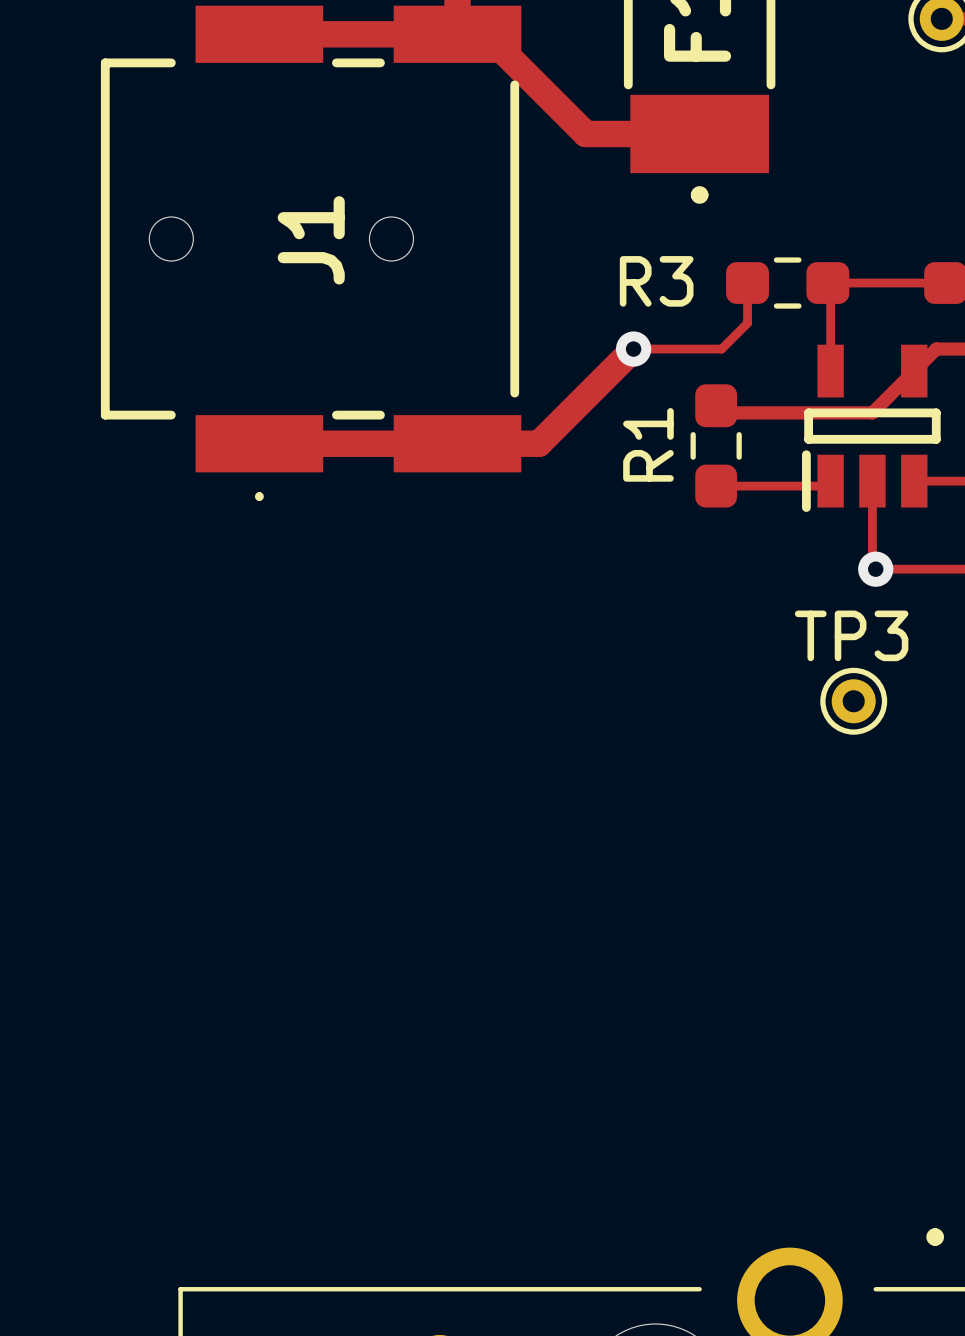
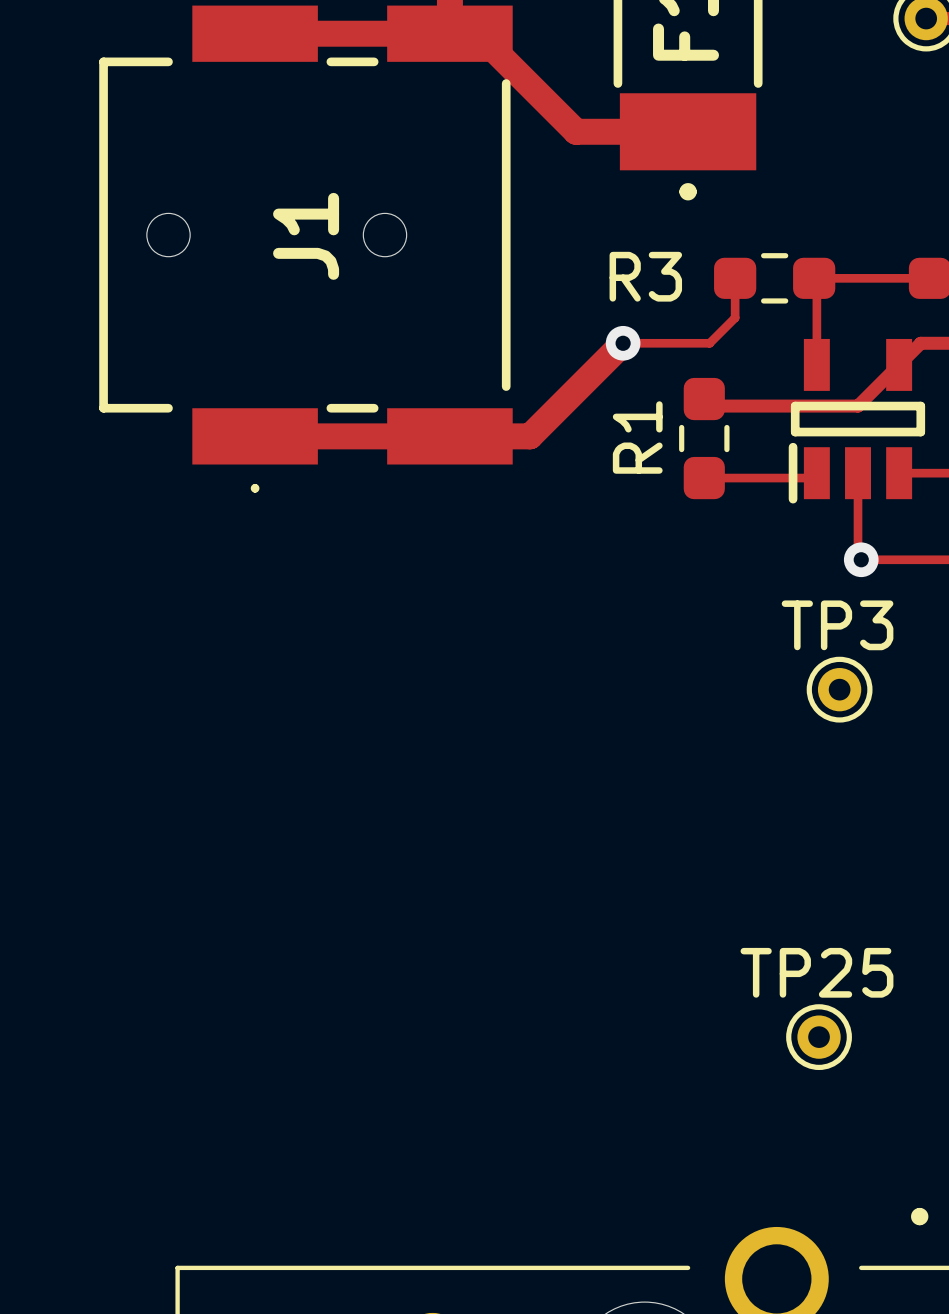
TP25: none -> (819, 1037)

